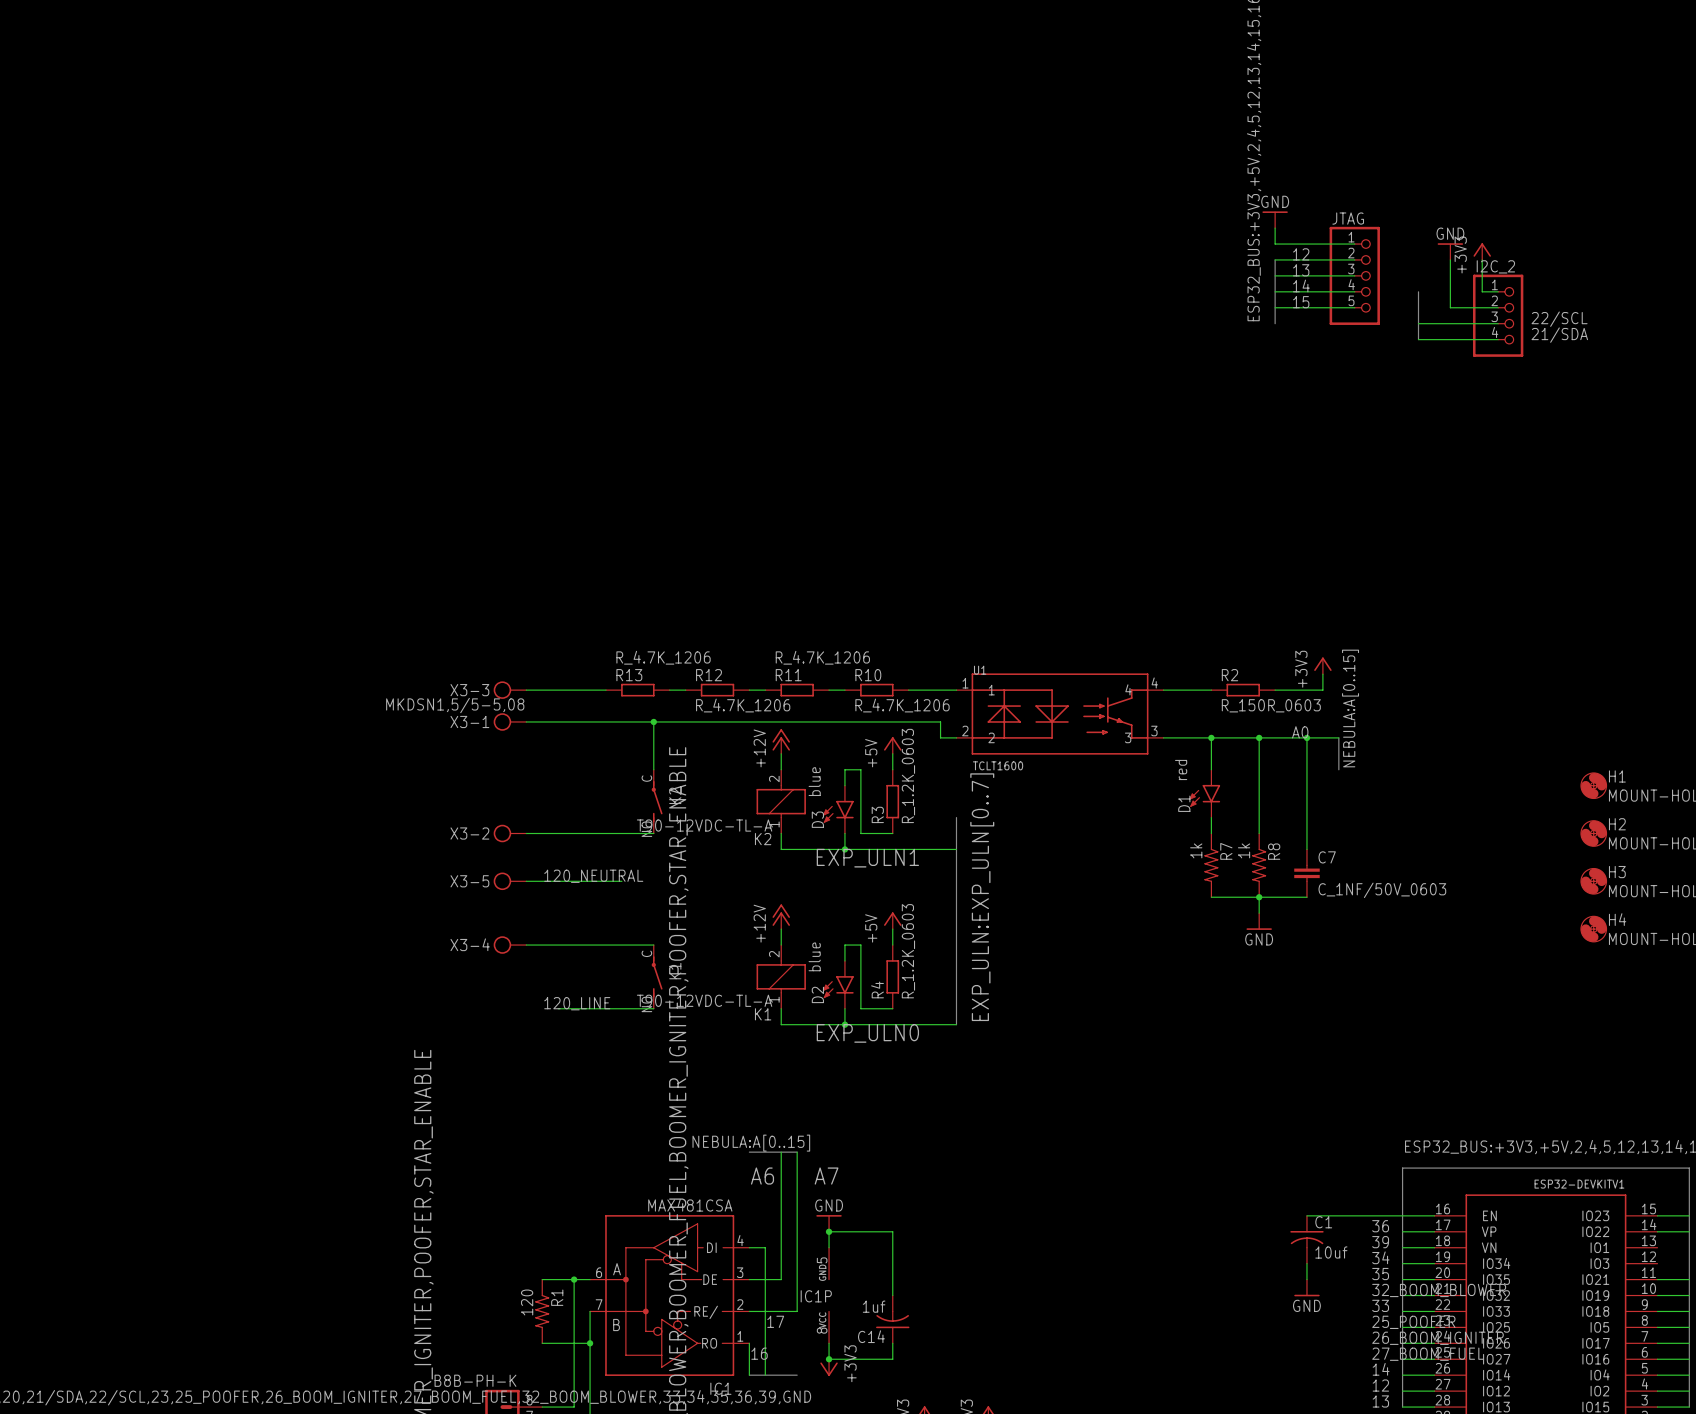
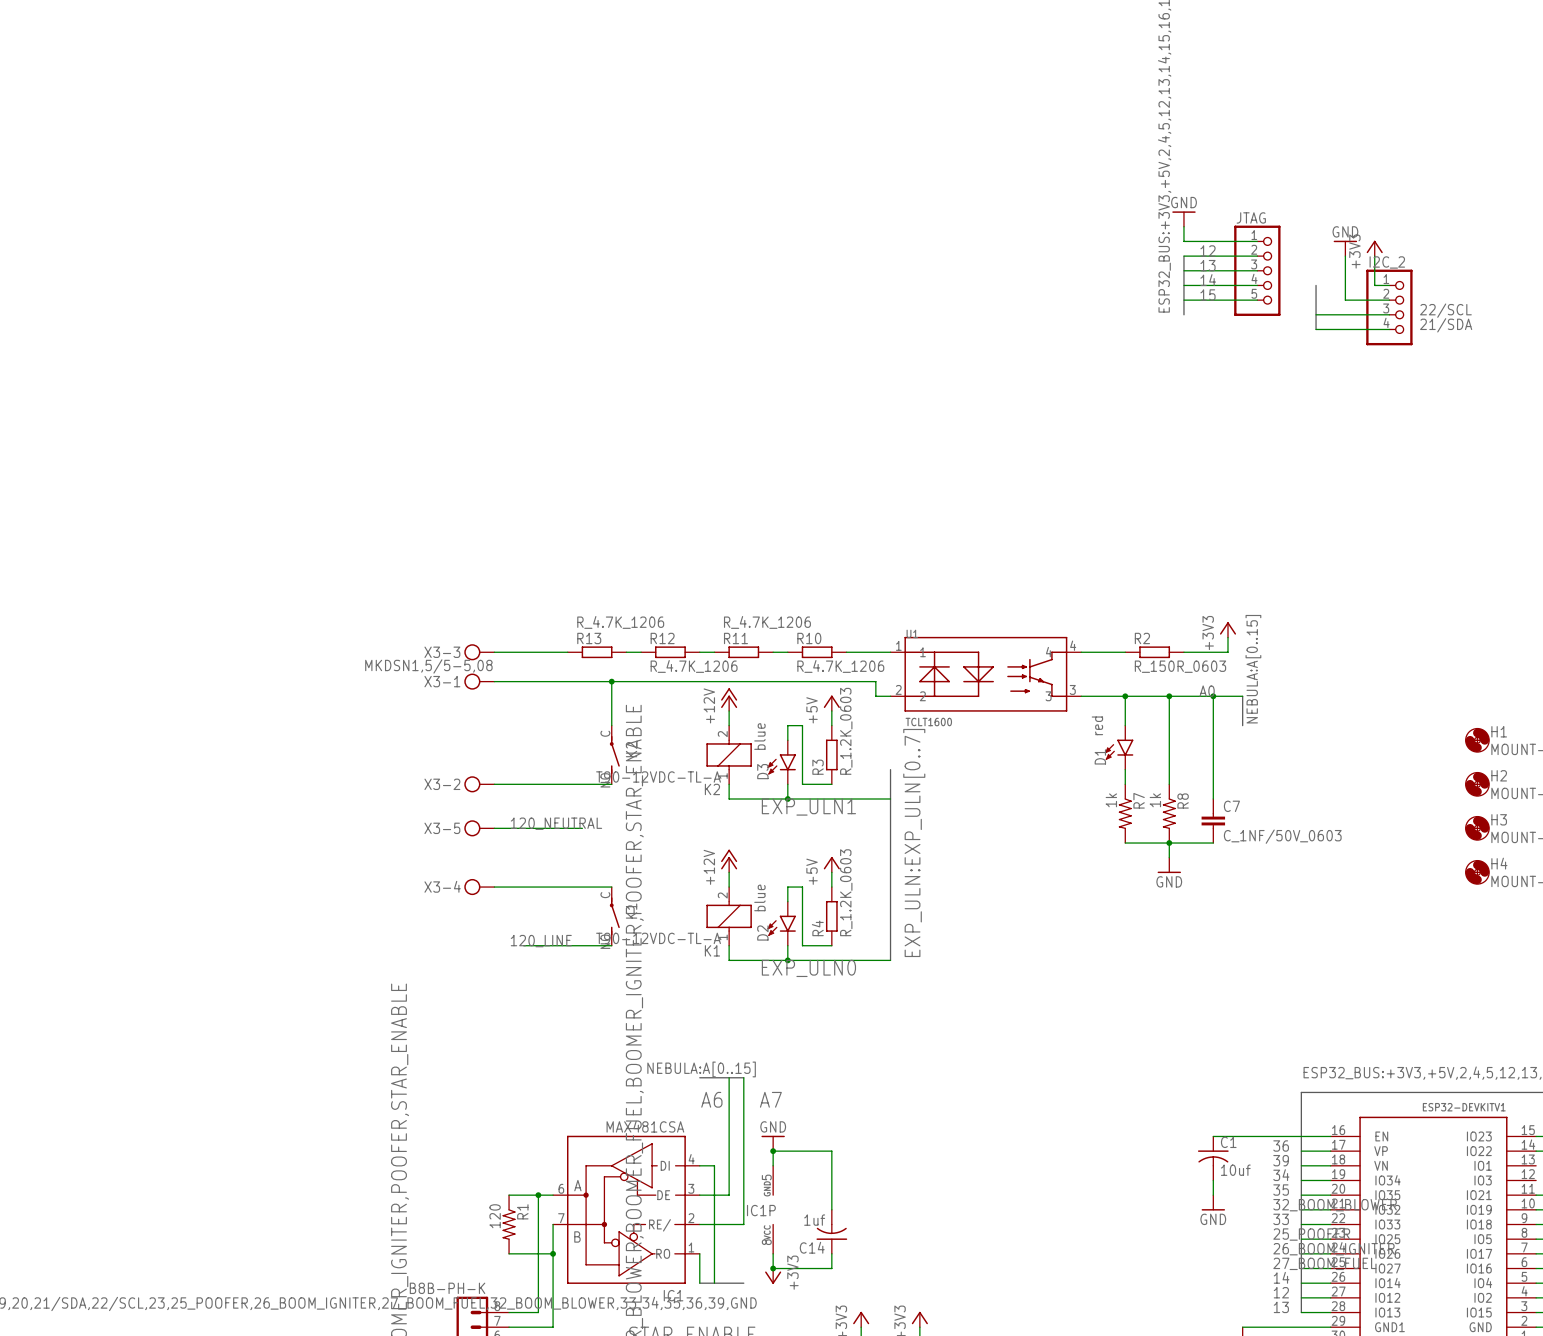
label: 17 (775, 1321) -> none
label: 16 (759, 1353) -> none

